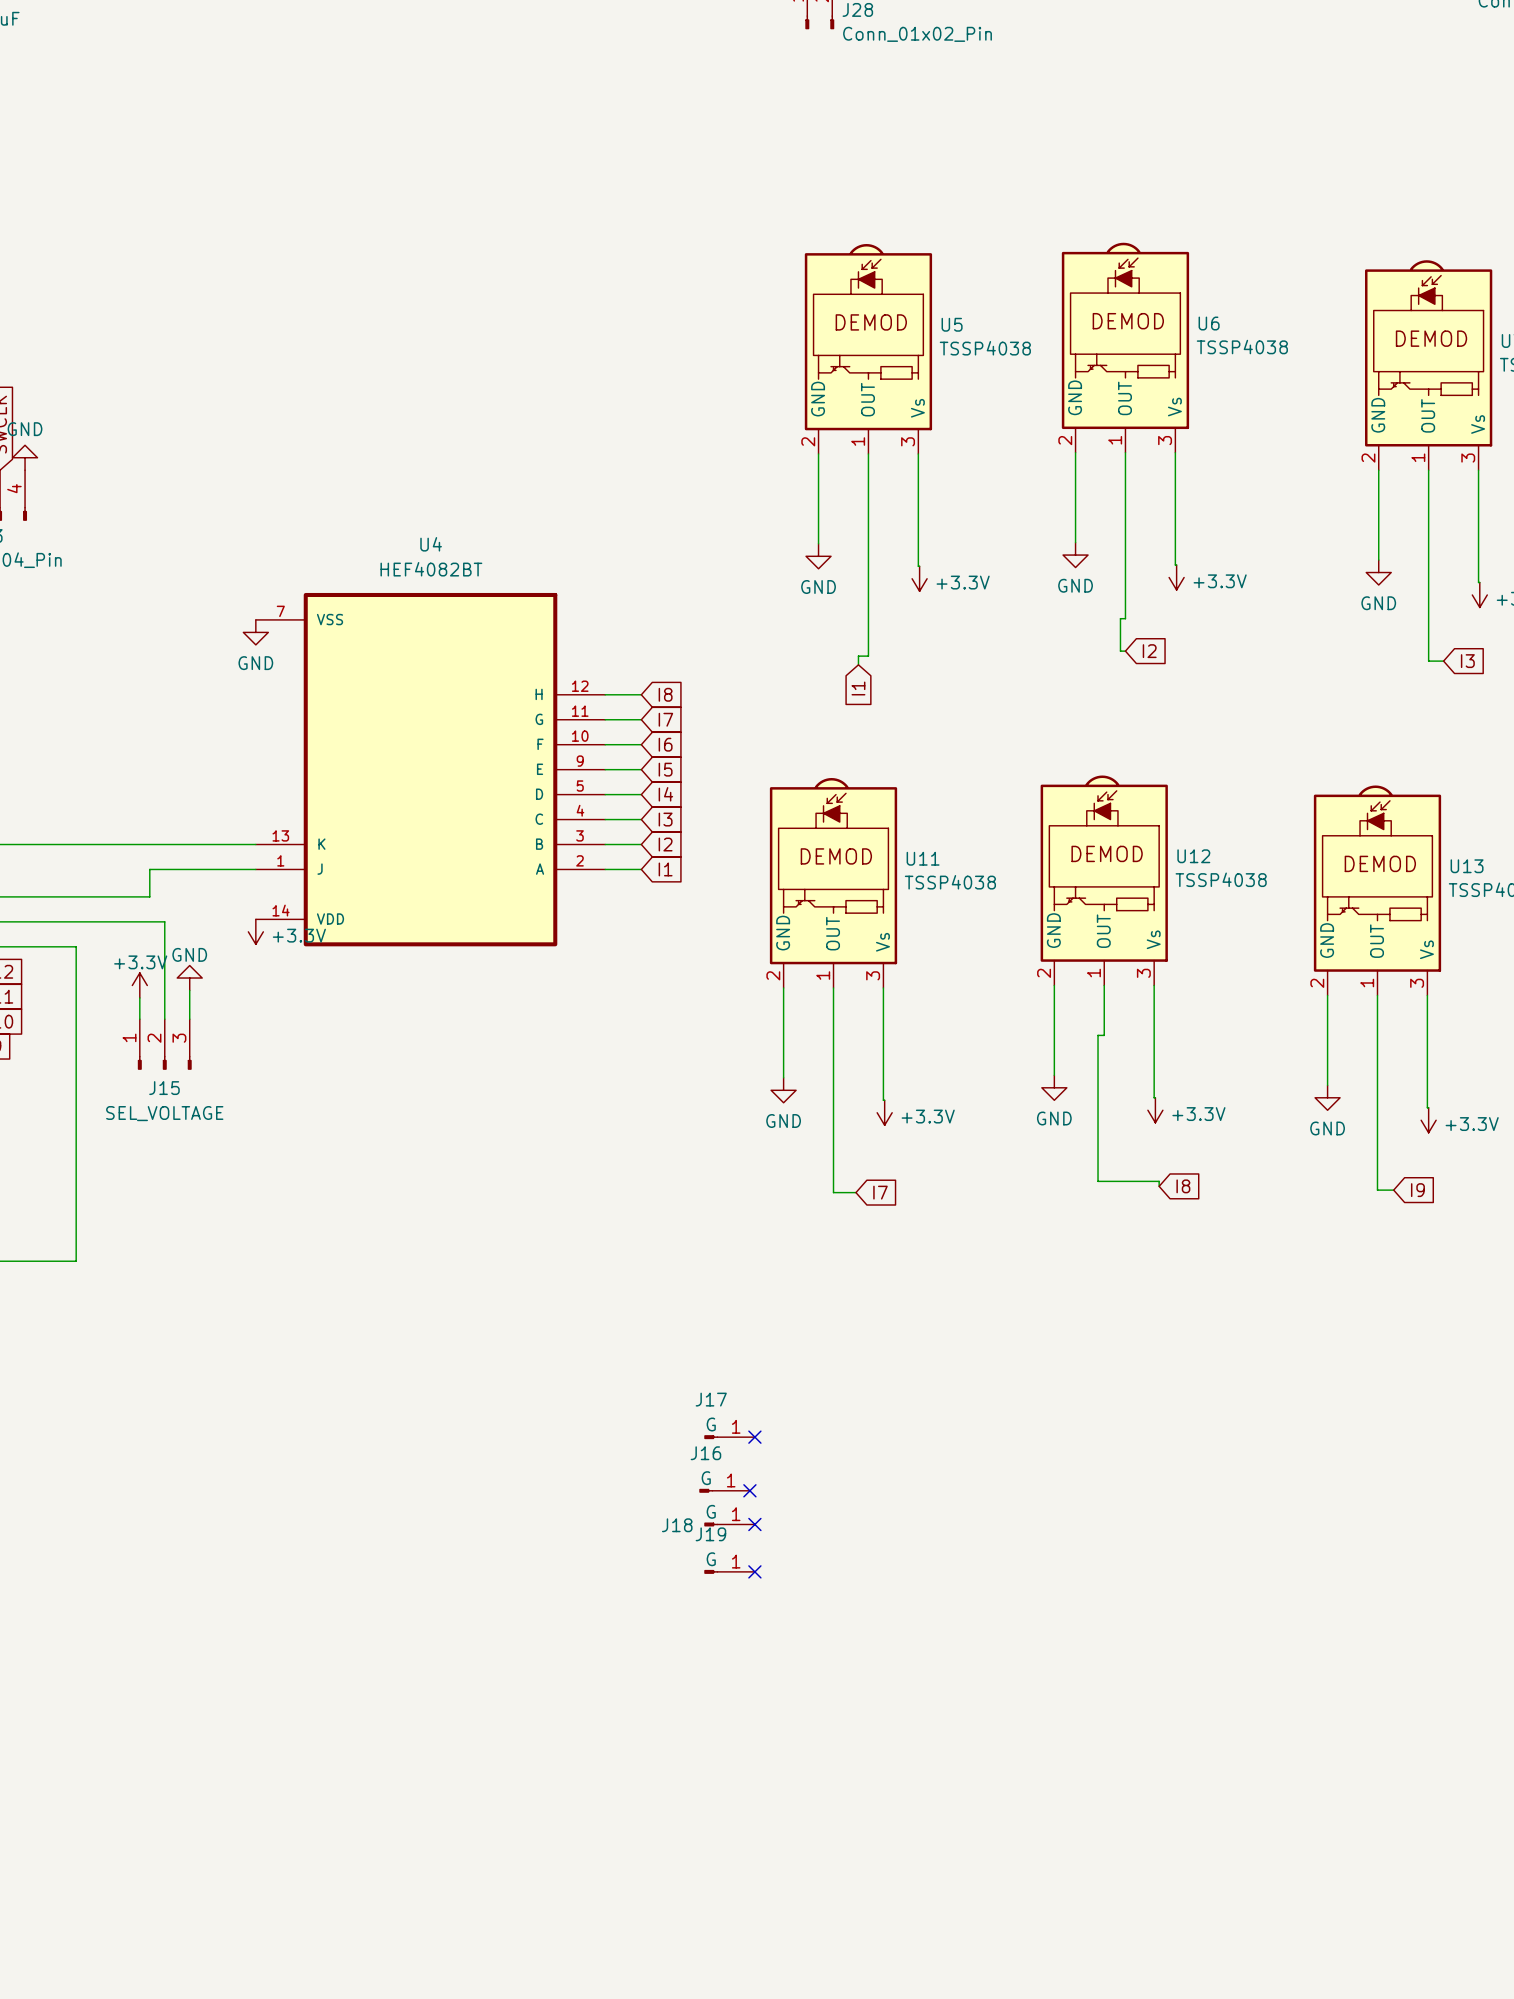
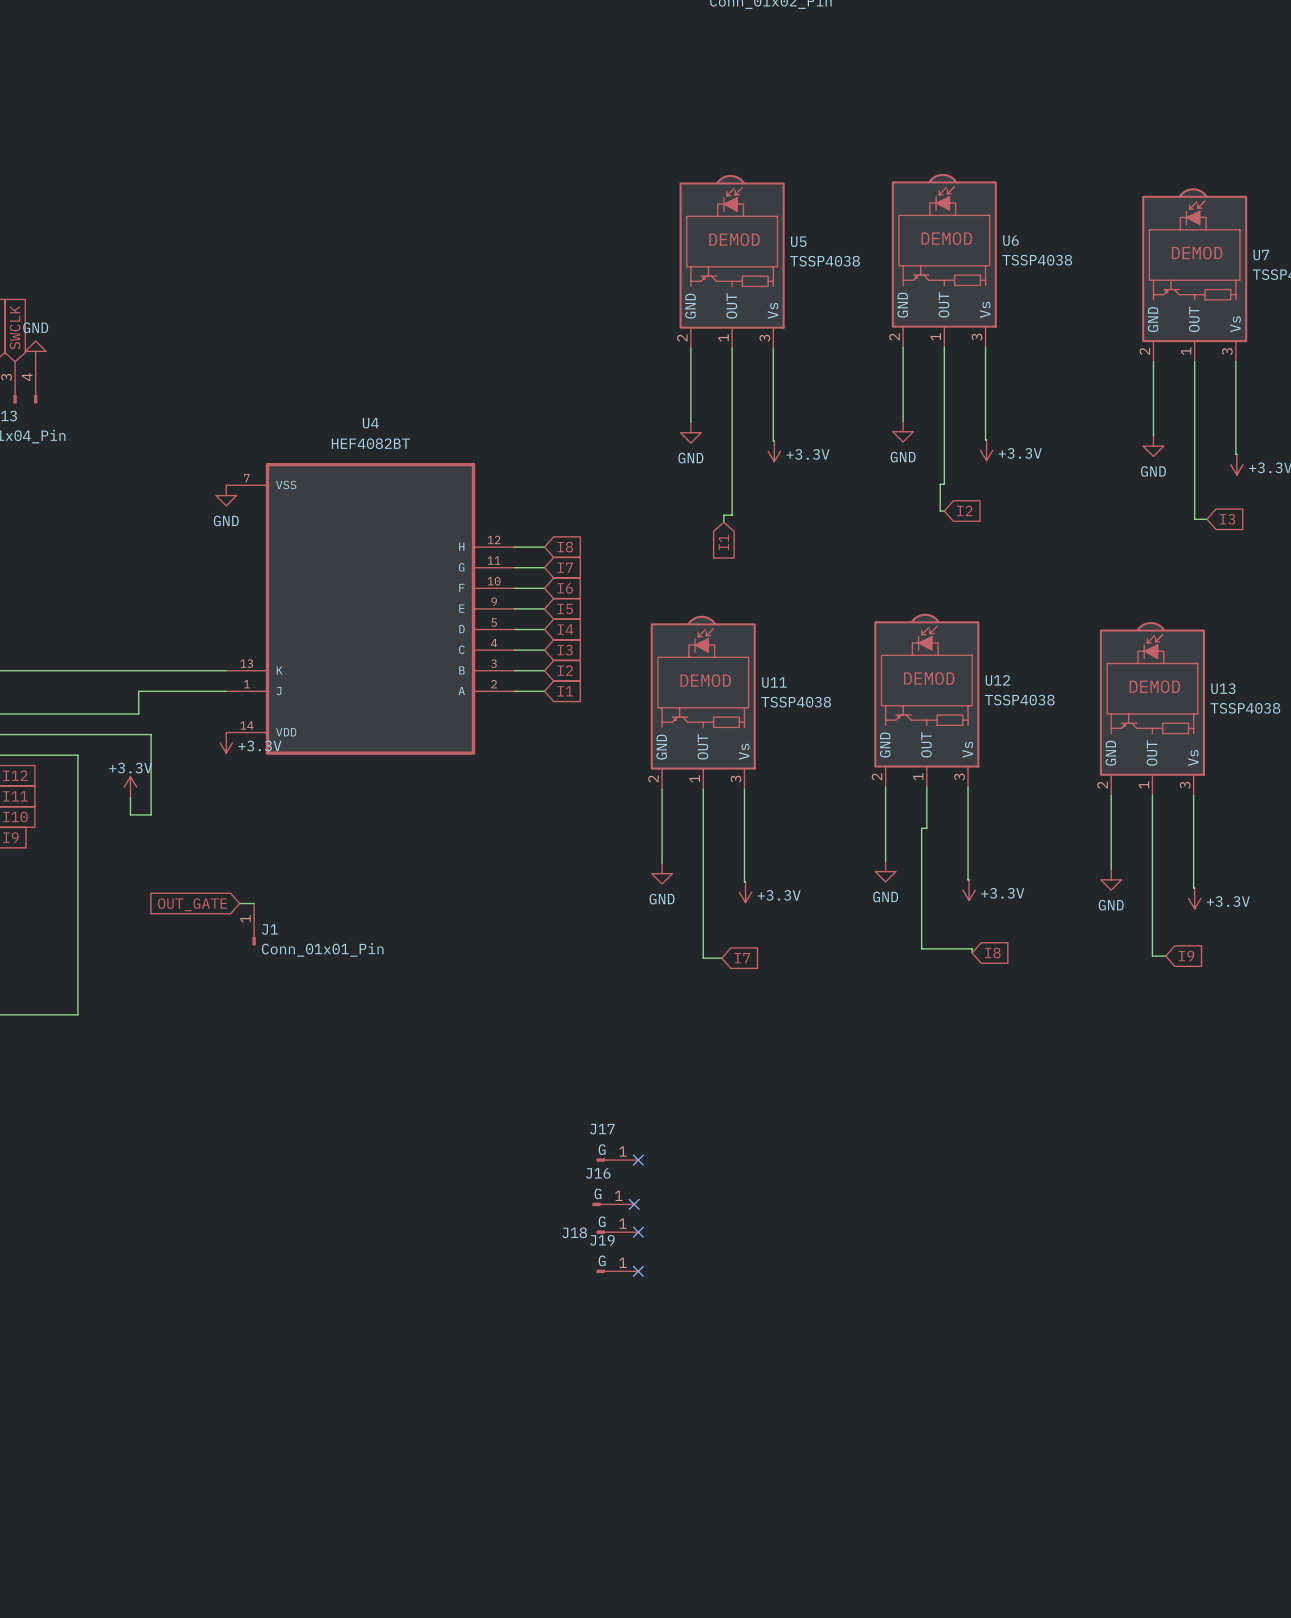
power symbol: GND (189, 978) -> none
wire: (189, 990) (189, 1019) -> none
wire: none -> (130, 814) (151, 814)
J15: SEL_VOLTAGE (164, 1044) -> none
wire: none -> (239, 903) (254, 903)
global label: none -> OUT_GATE (192, 904)
J1: none -> Conn_01x01_Pin (254, 924)

